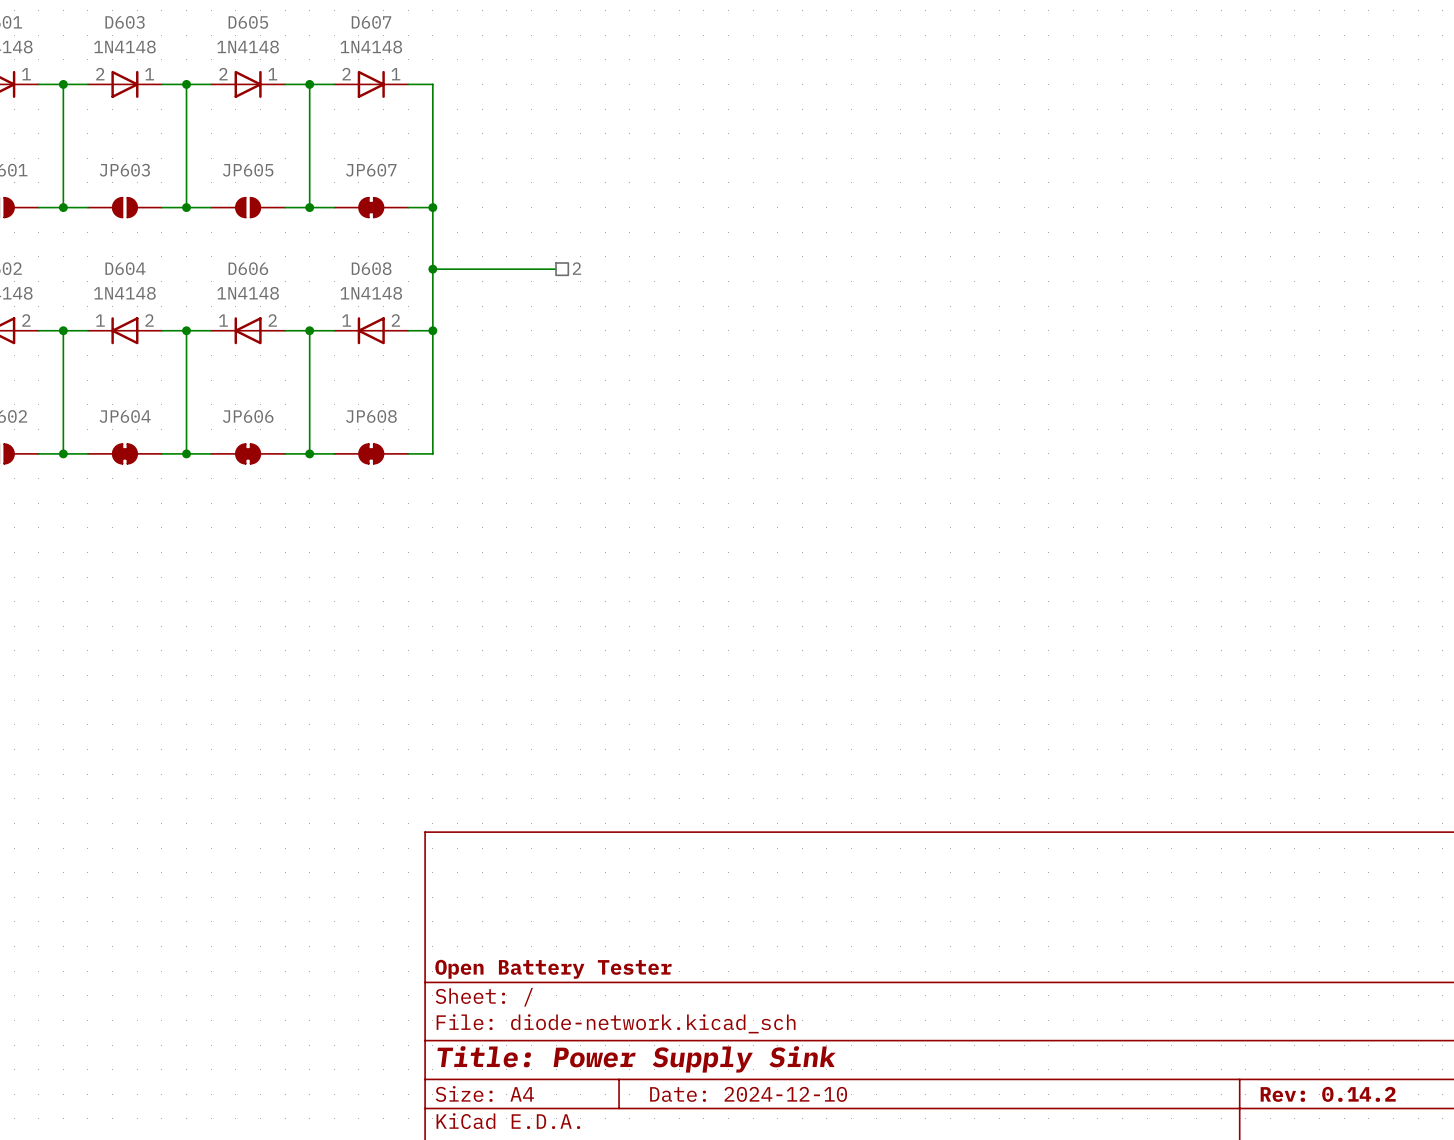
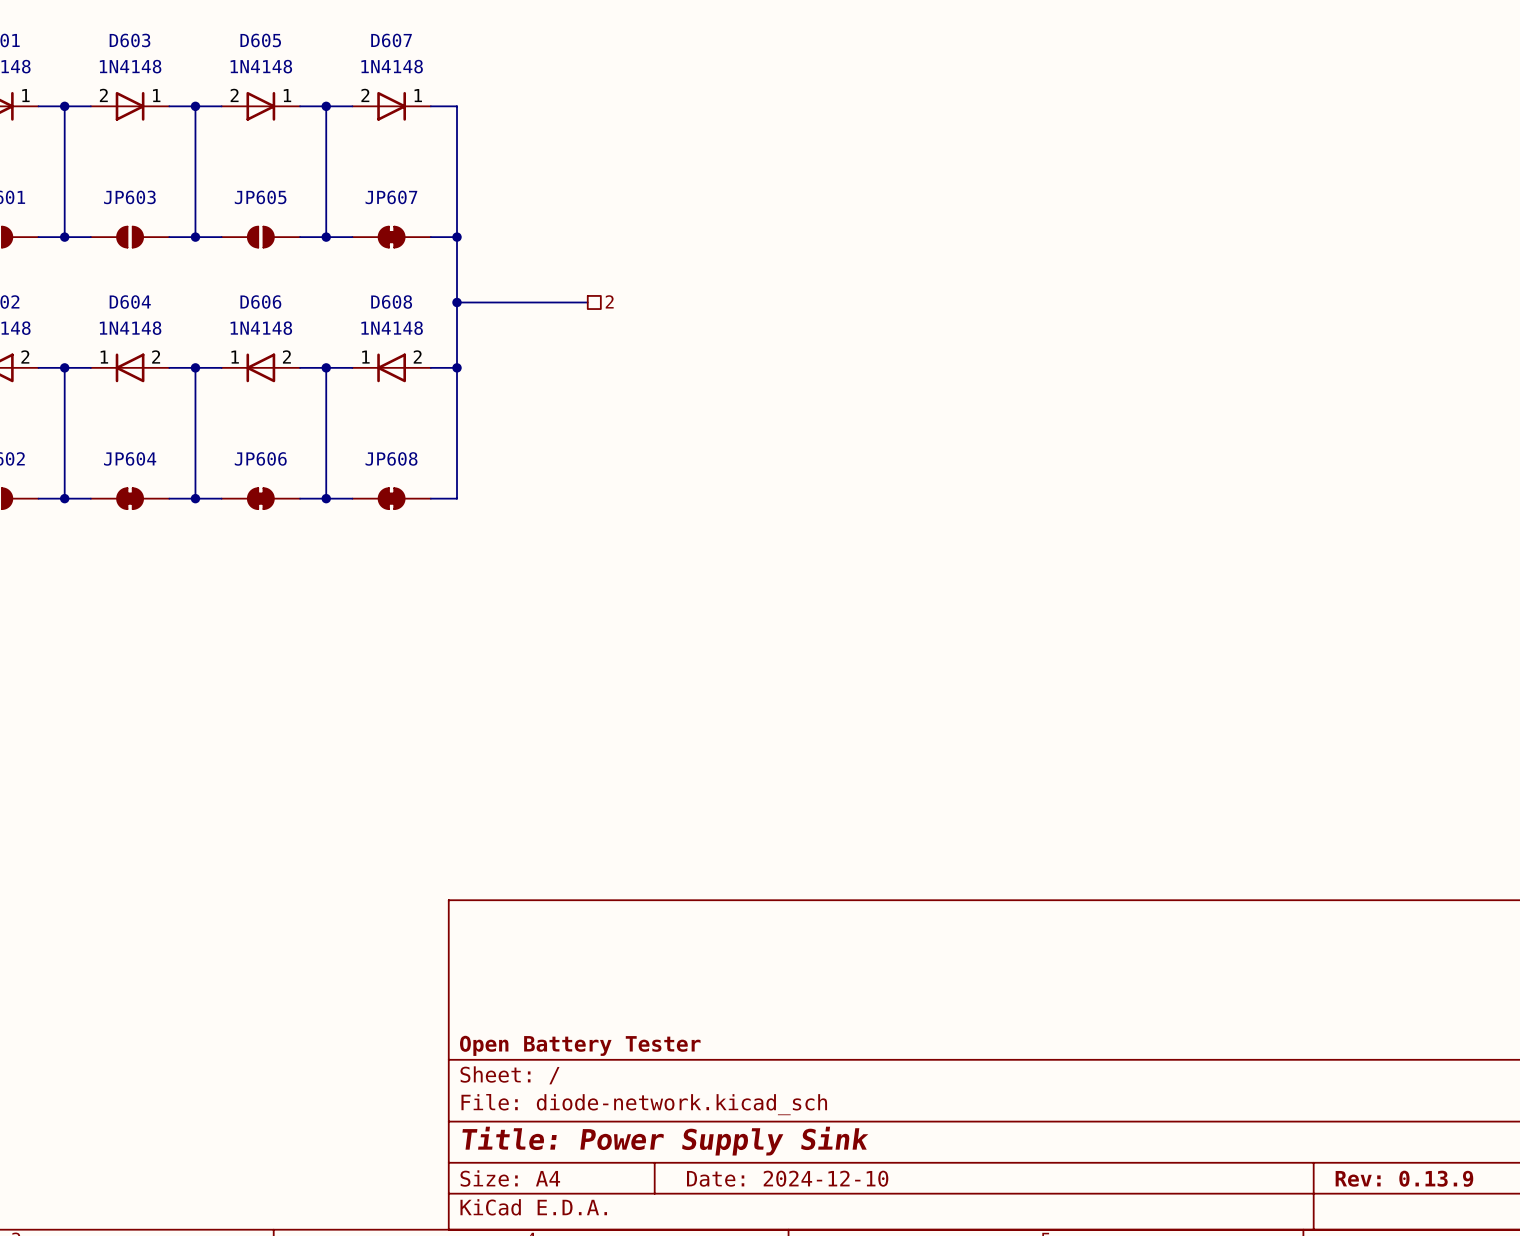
title block: Rev: 0.14.2 (1328, 1094) -> Rev: 0.13.9 (1404, 1178)

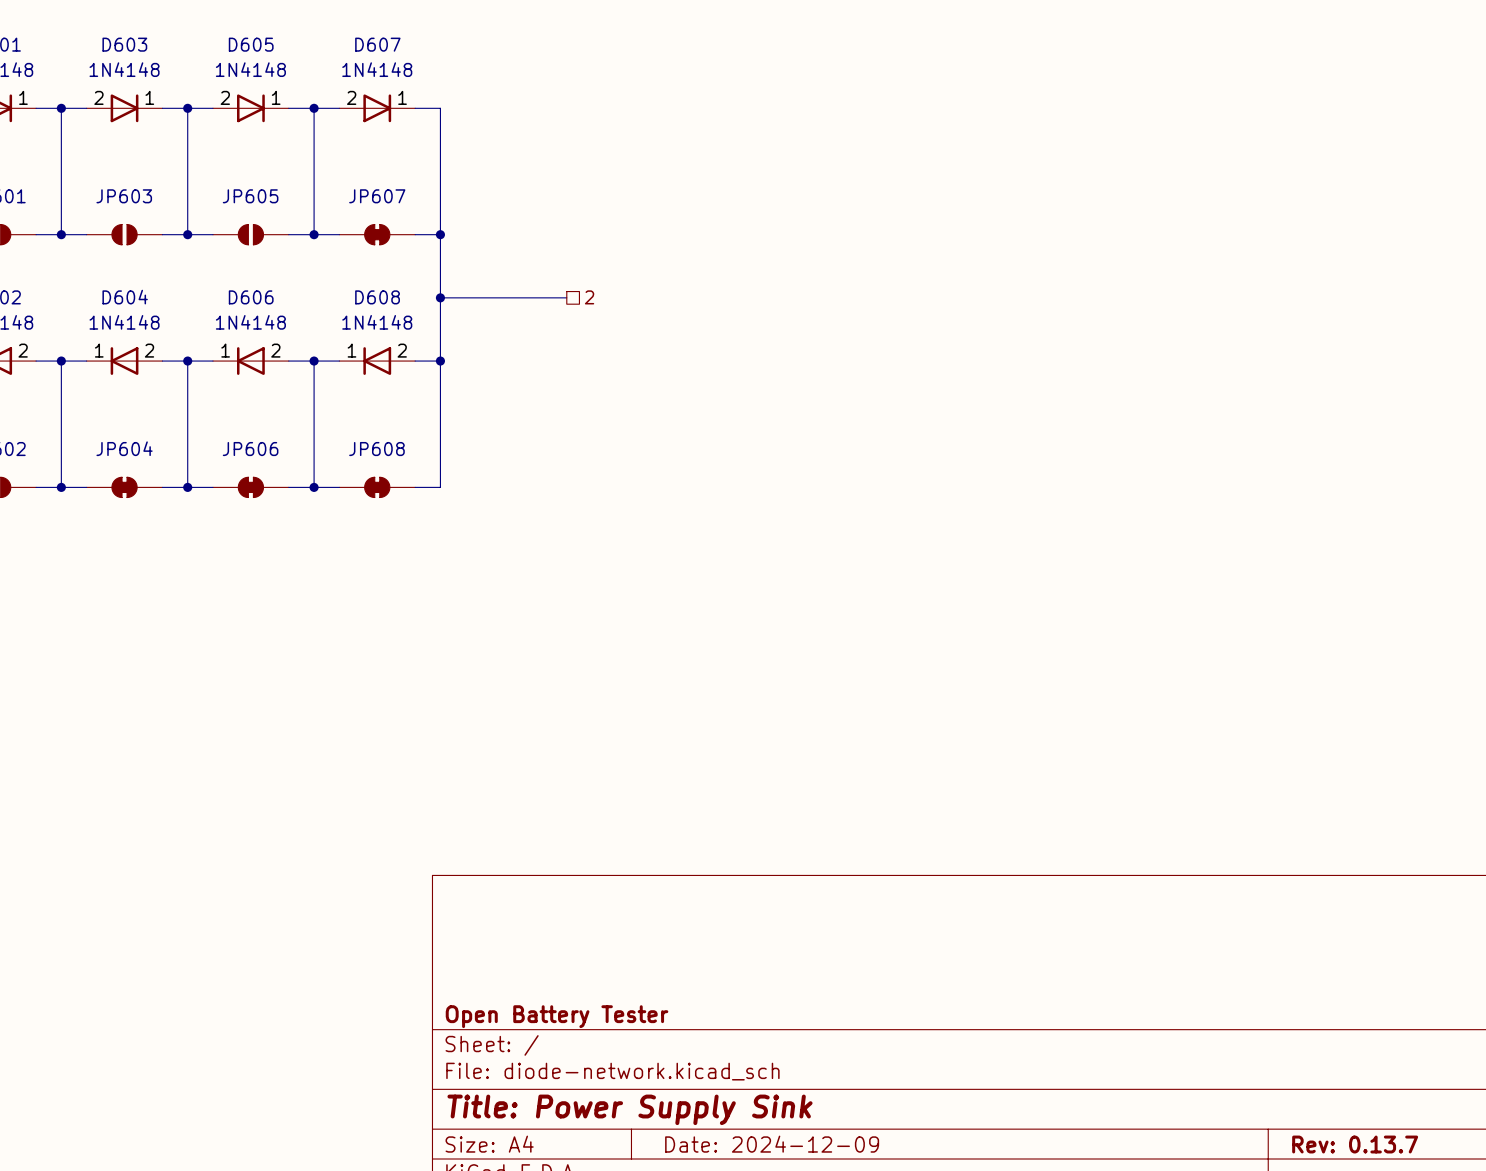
title block: Date: 2024-12-10 (787, 1178) -> Date: 2024-12-09 (772, 1144)
title block: Rev: 0.13.9 (1404, 1178) -> Rev: 0.13.7 (1355, 1144)

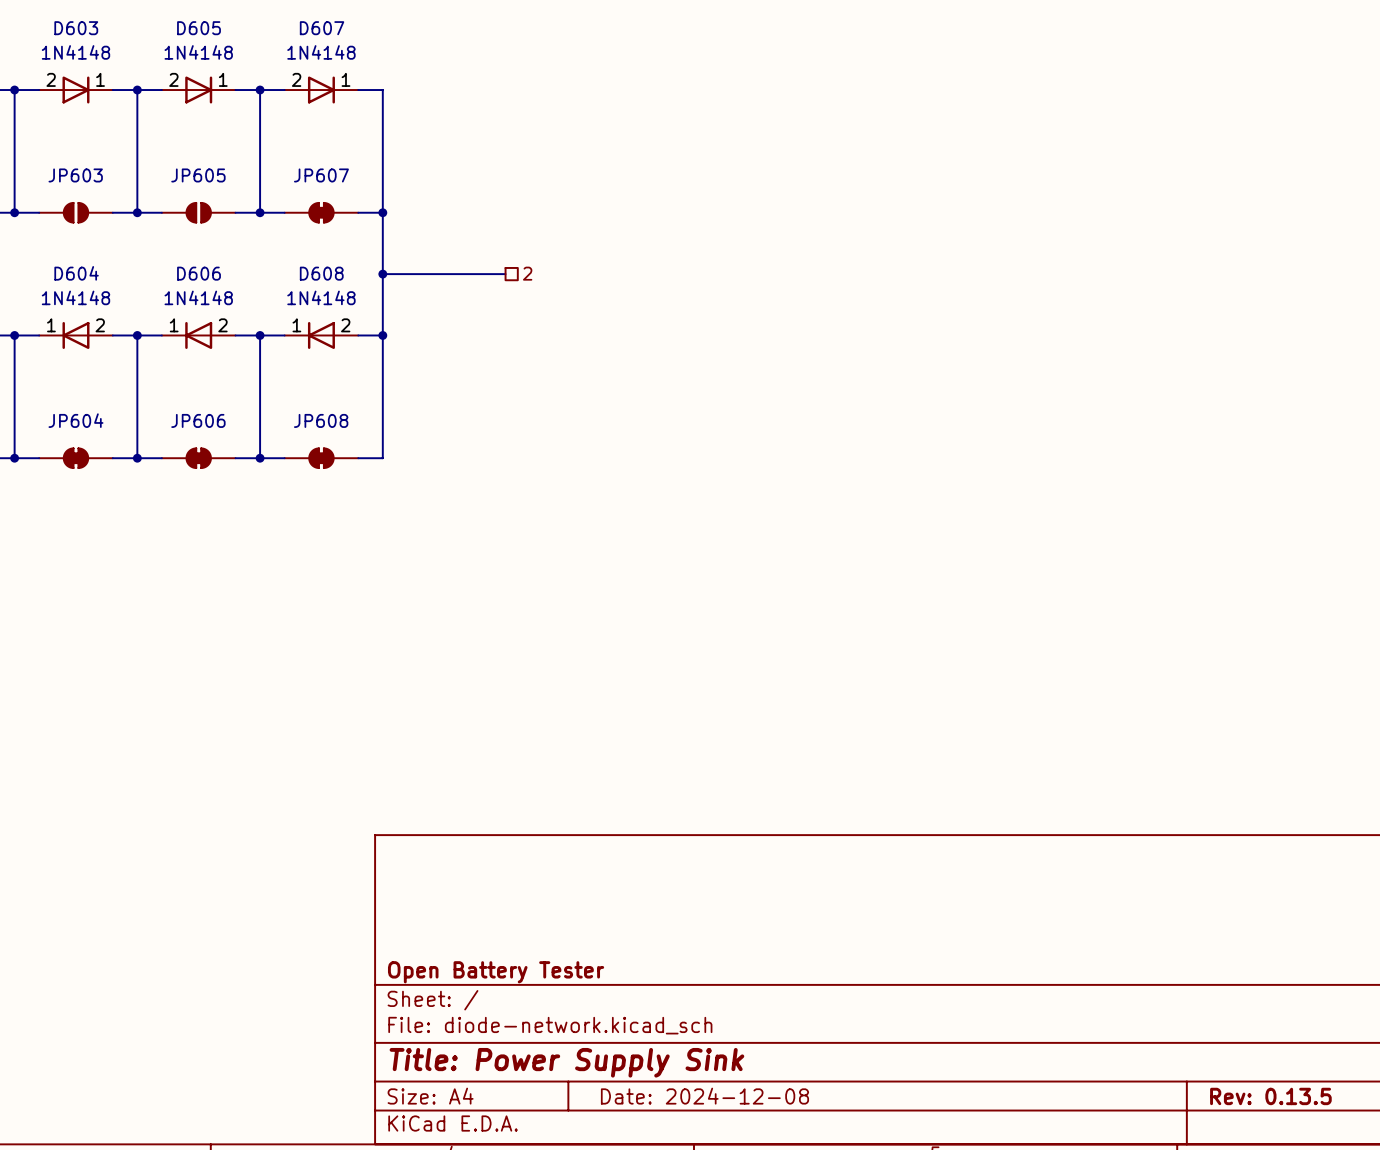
title block: Date: 2024-12-09 (772, 1144) -> Date: 2024-12-08 (704, 1096)
title block: Rev: 0.13.7 (1355, 1144) -> Rev: 0.13.5 (1270, 1096)

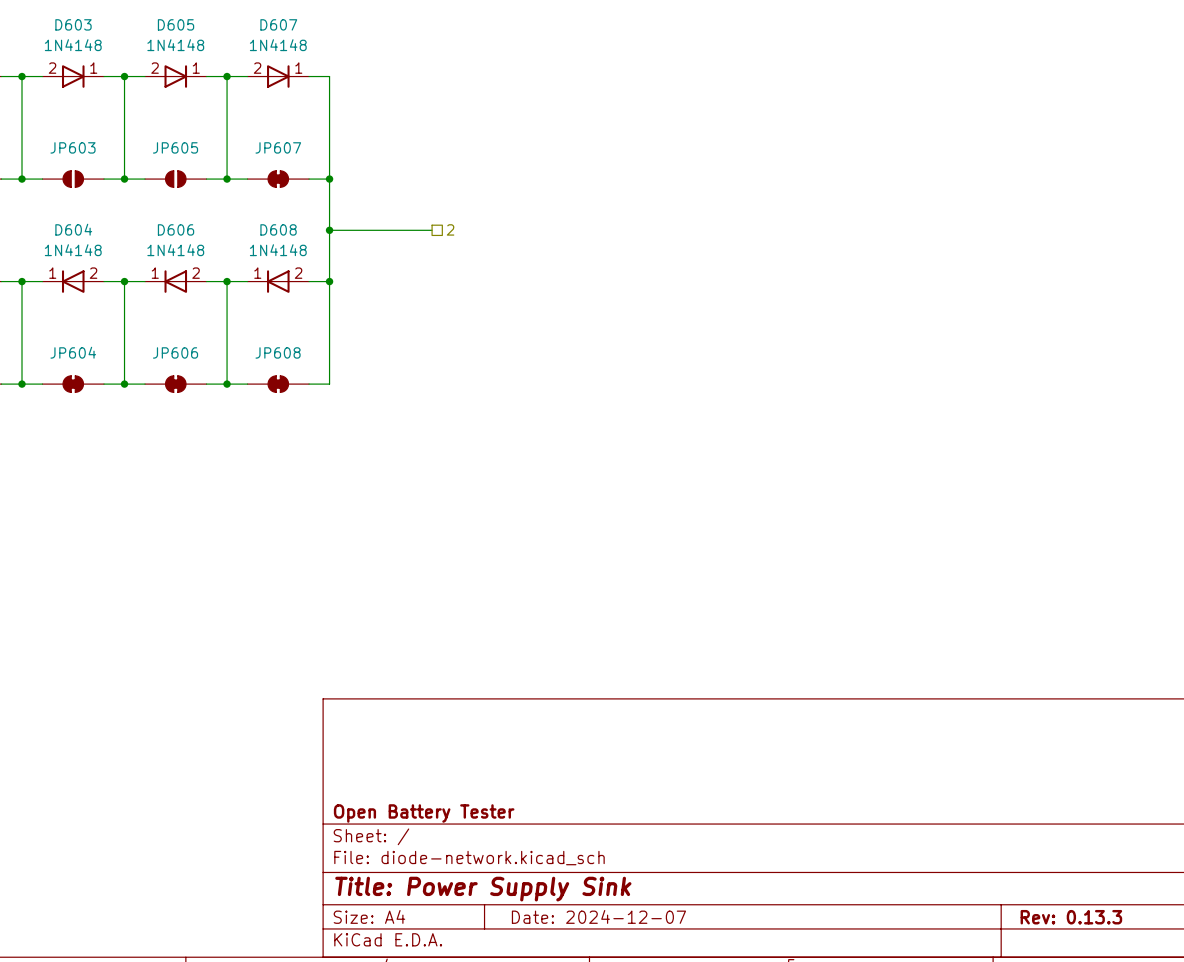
title block: Date: 2024-12-08 (704, 1096) -> Date: 2024-12-07 (598, 916)
title block: Rev: 0.13.5 (1270, 1096) -> Rev: 0.13.3 (1071, 917)

